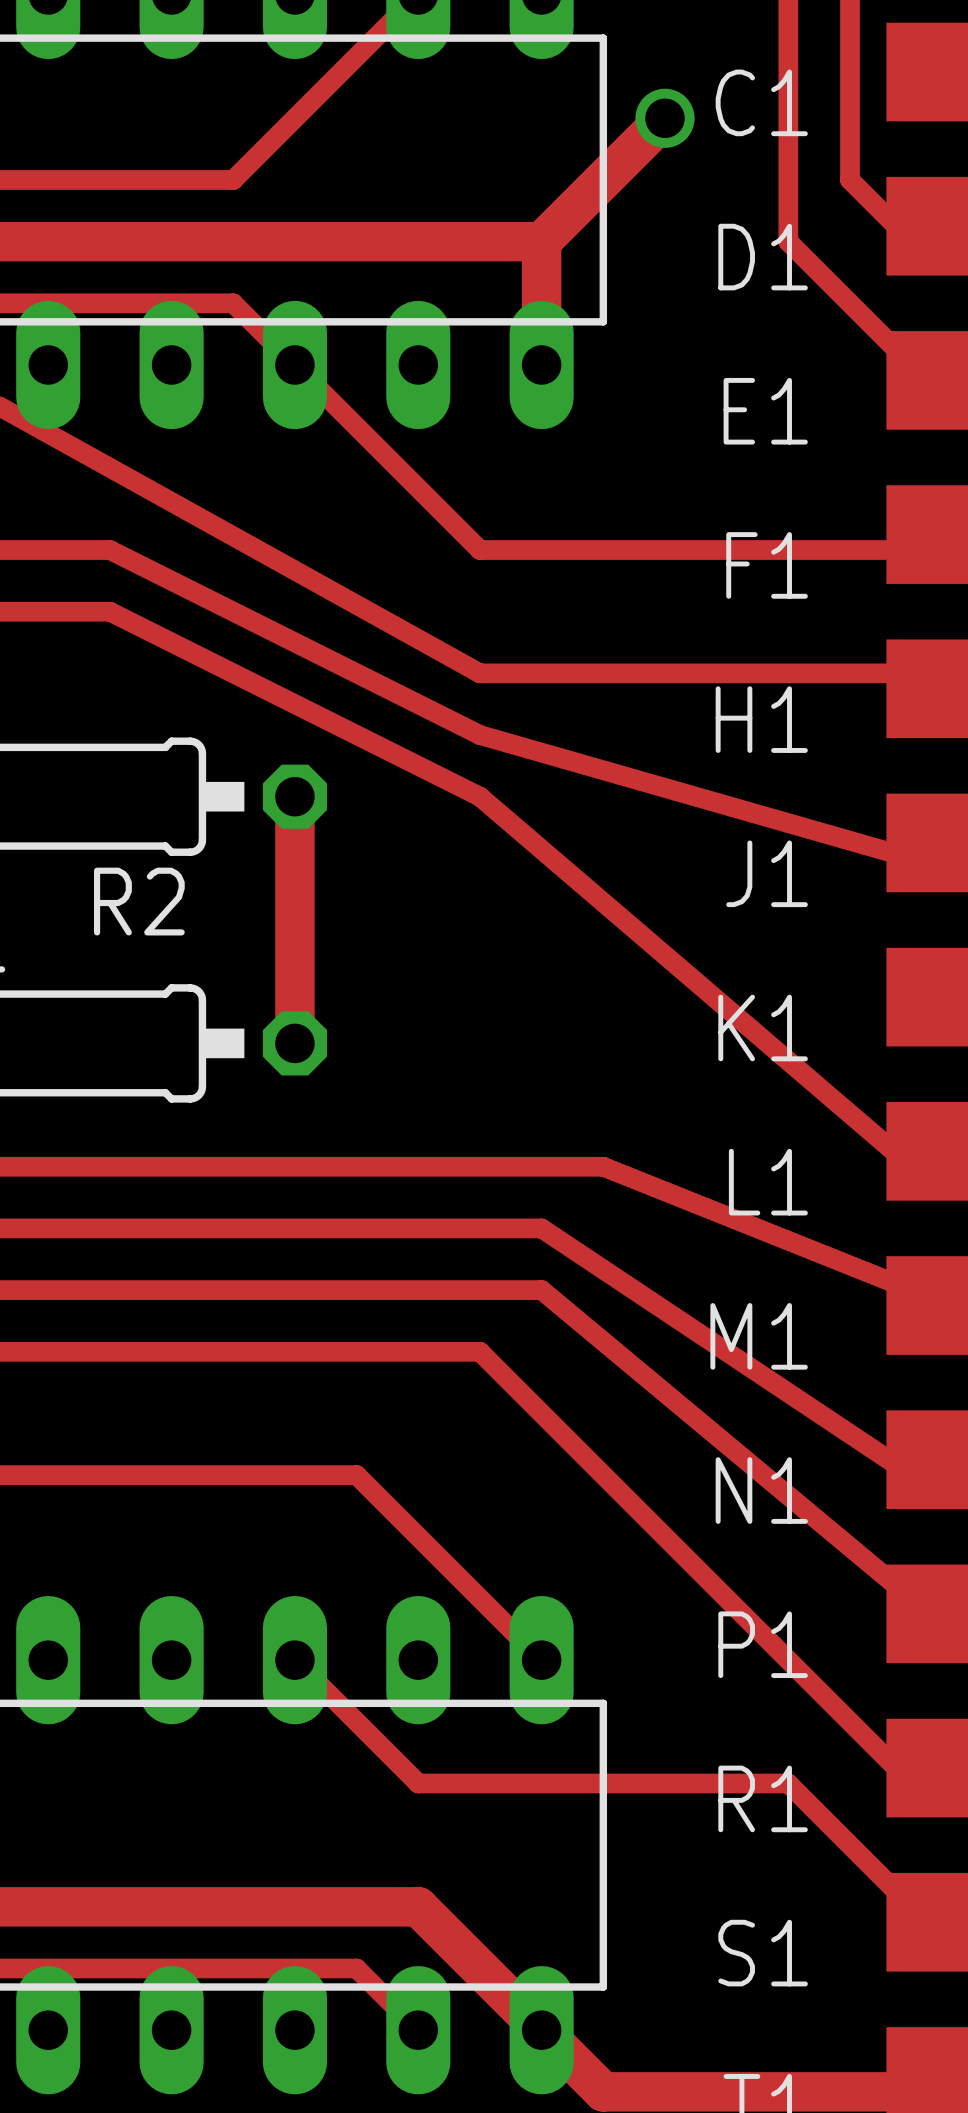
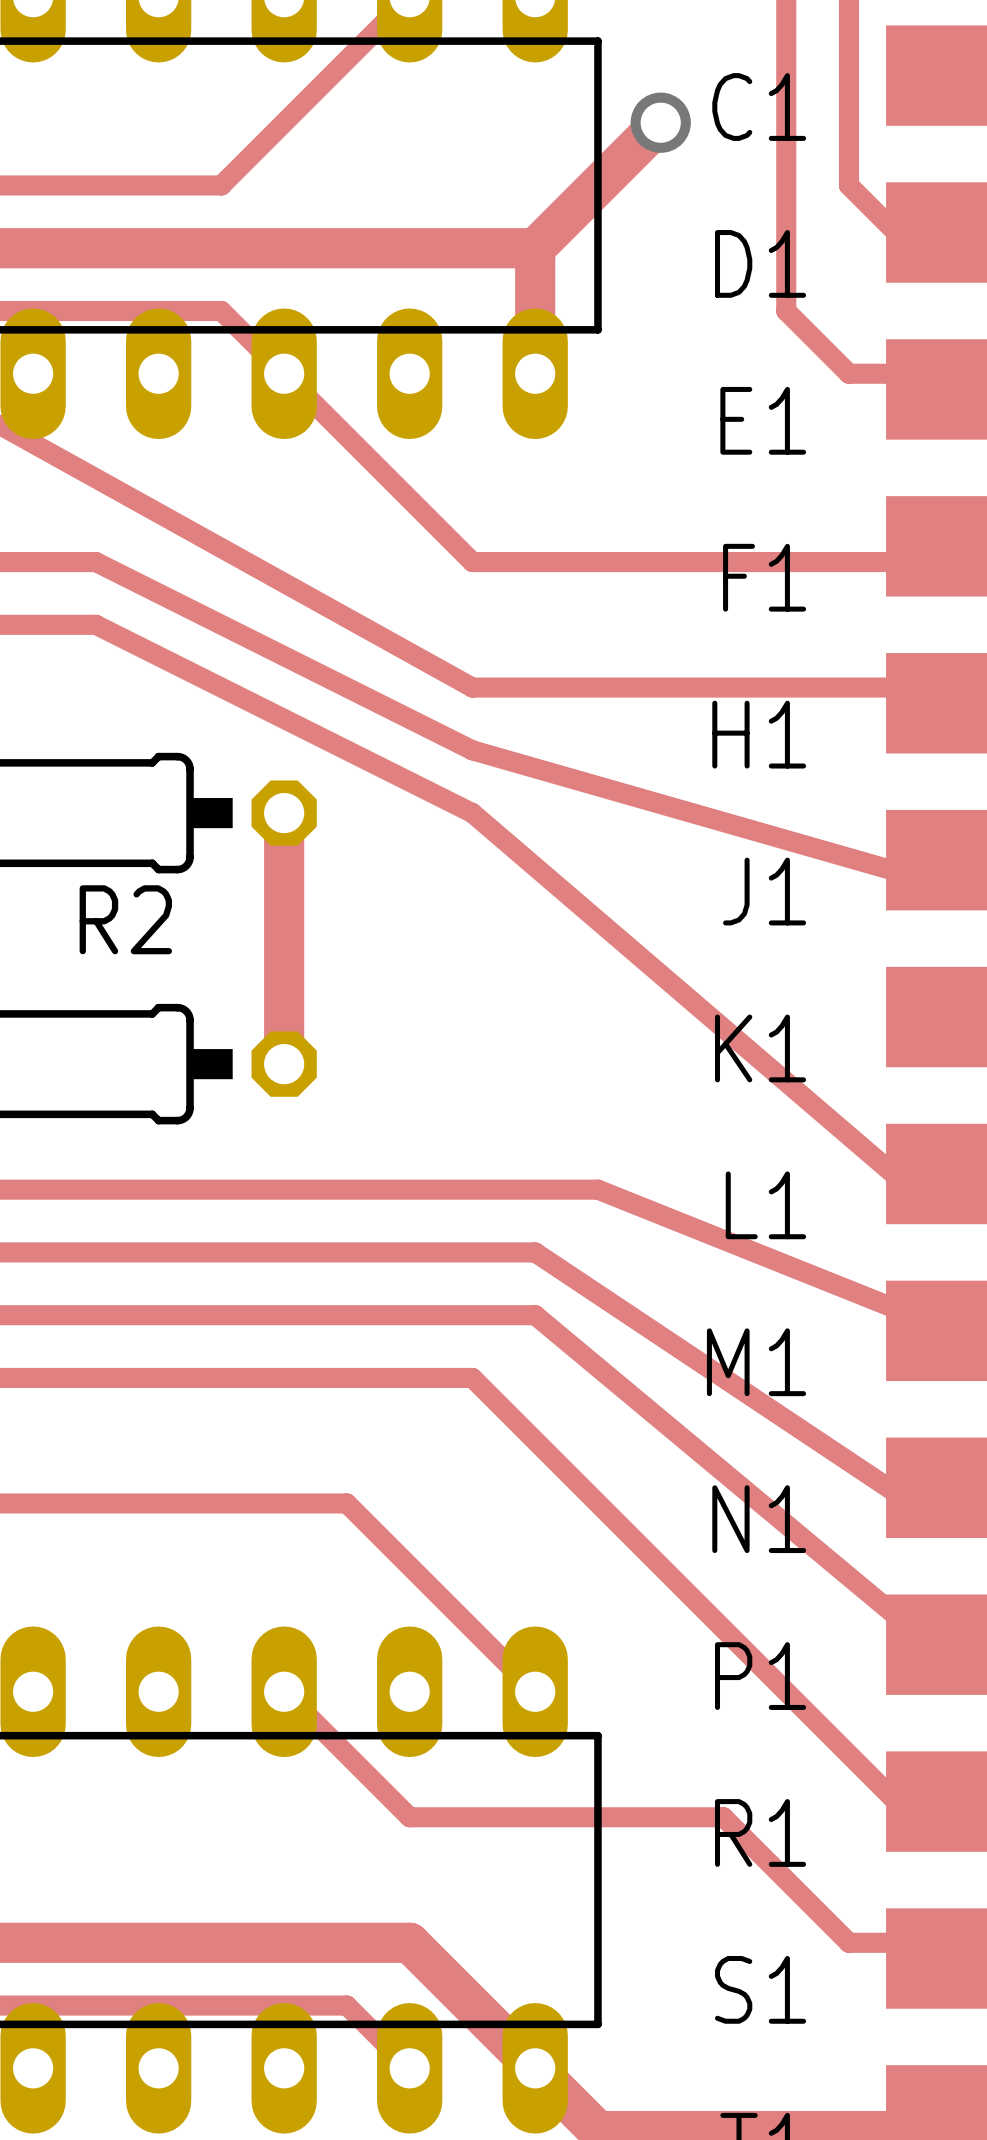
track: (788, 241) (911, 364) -> (786, 248) (786, 310) (849, 373) (911, 373)
track: (726, 1783) (788, 1783) (911, 1906) -> (723, 1817) (849, 1942) (911, 1942)

